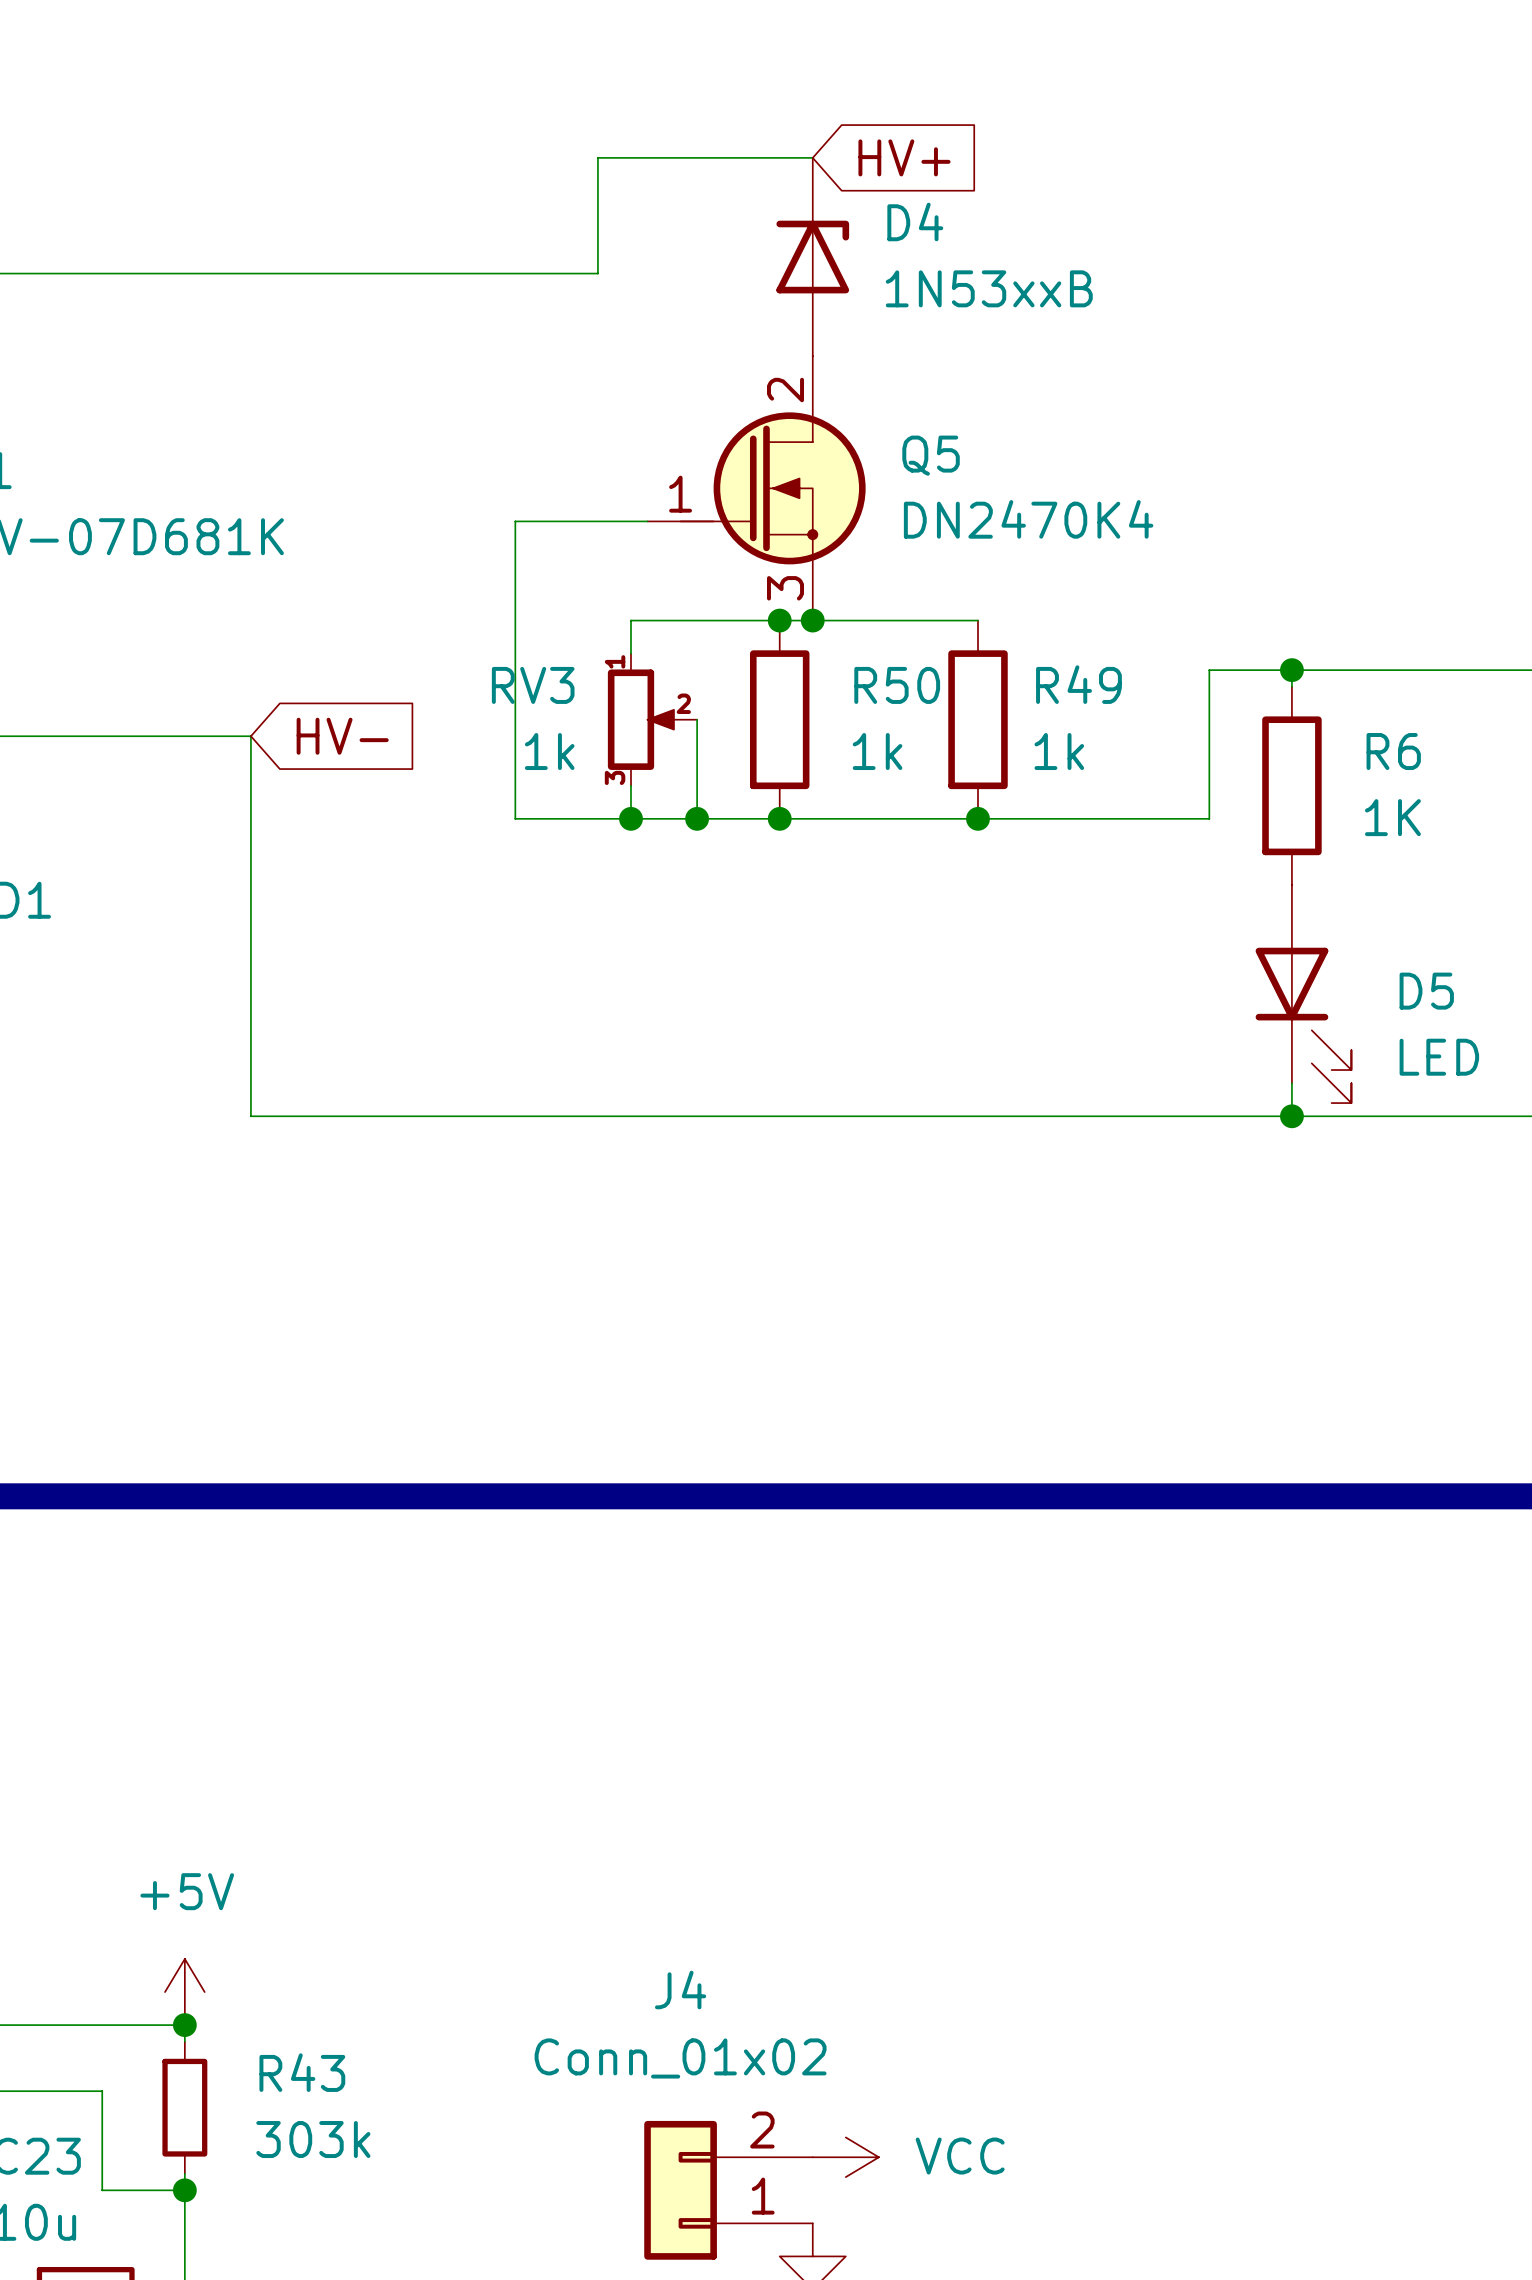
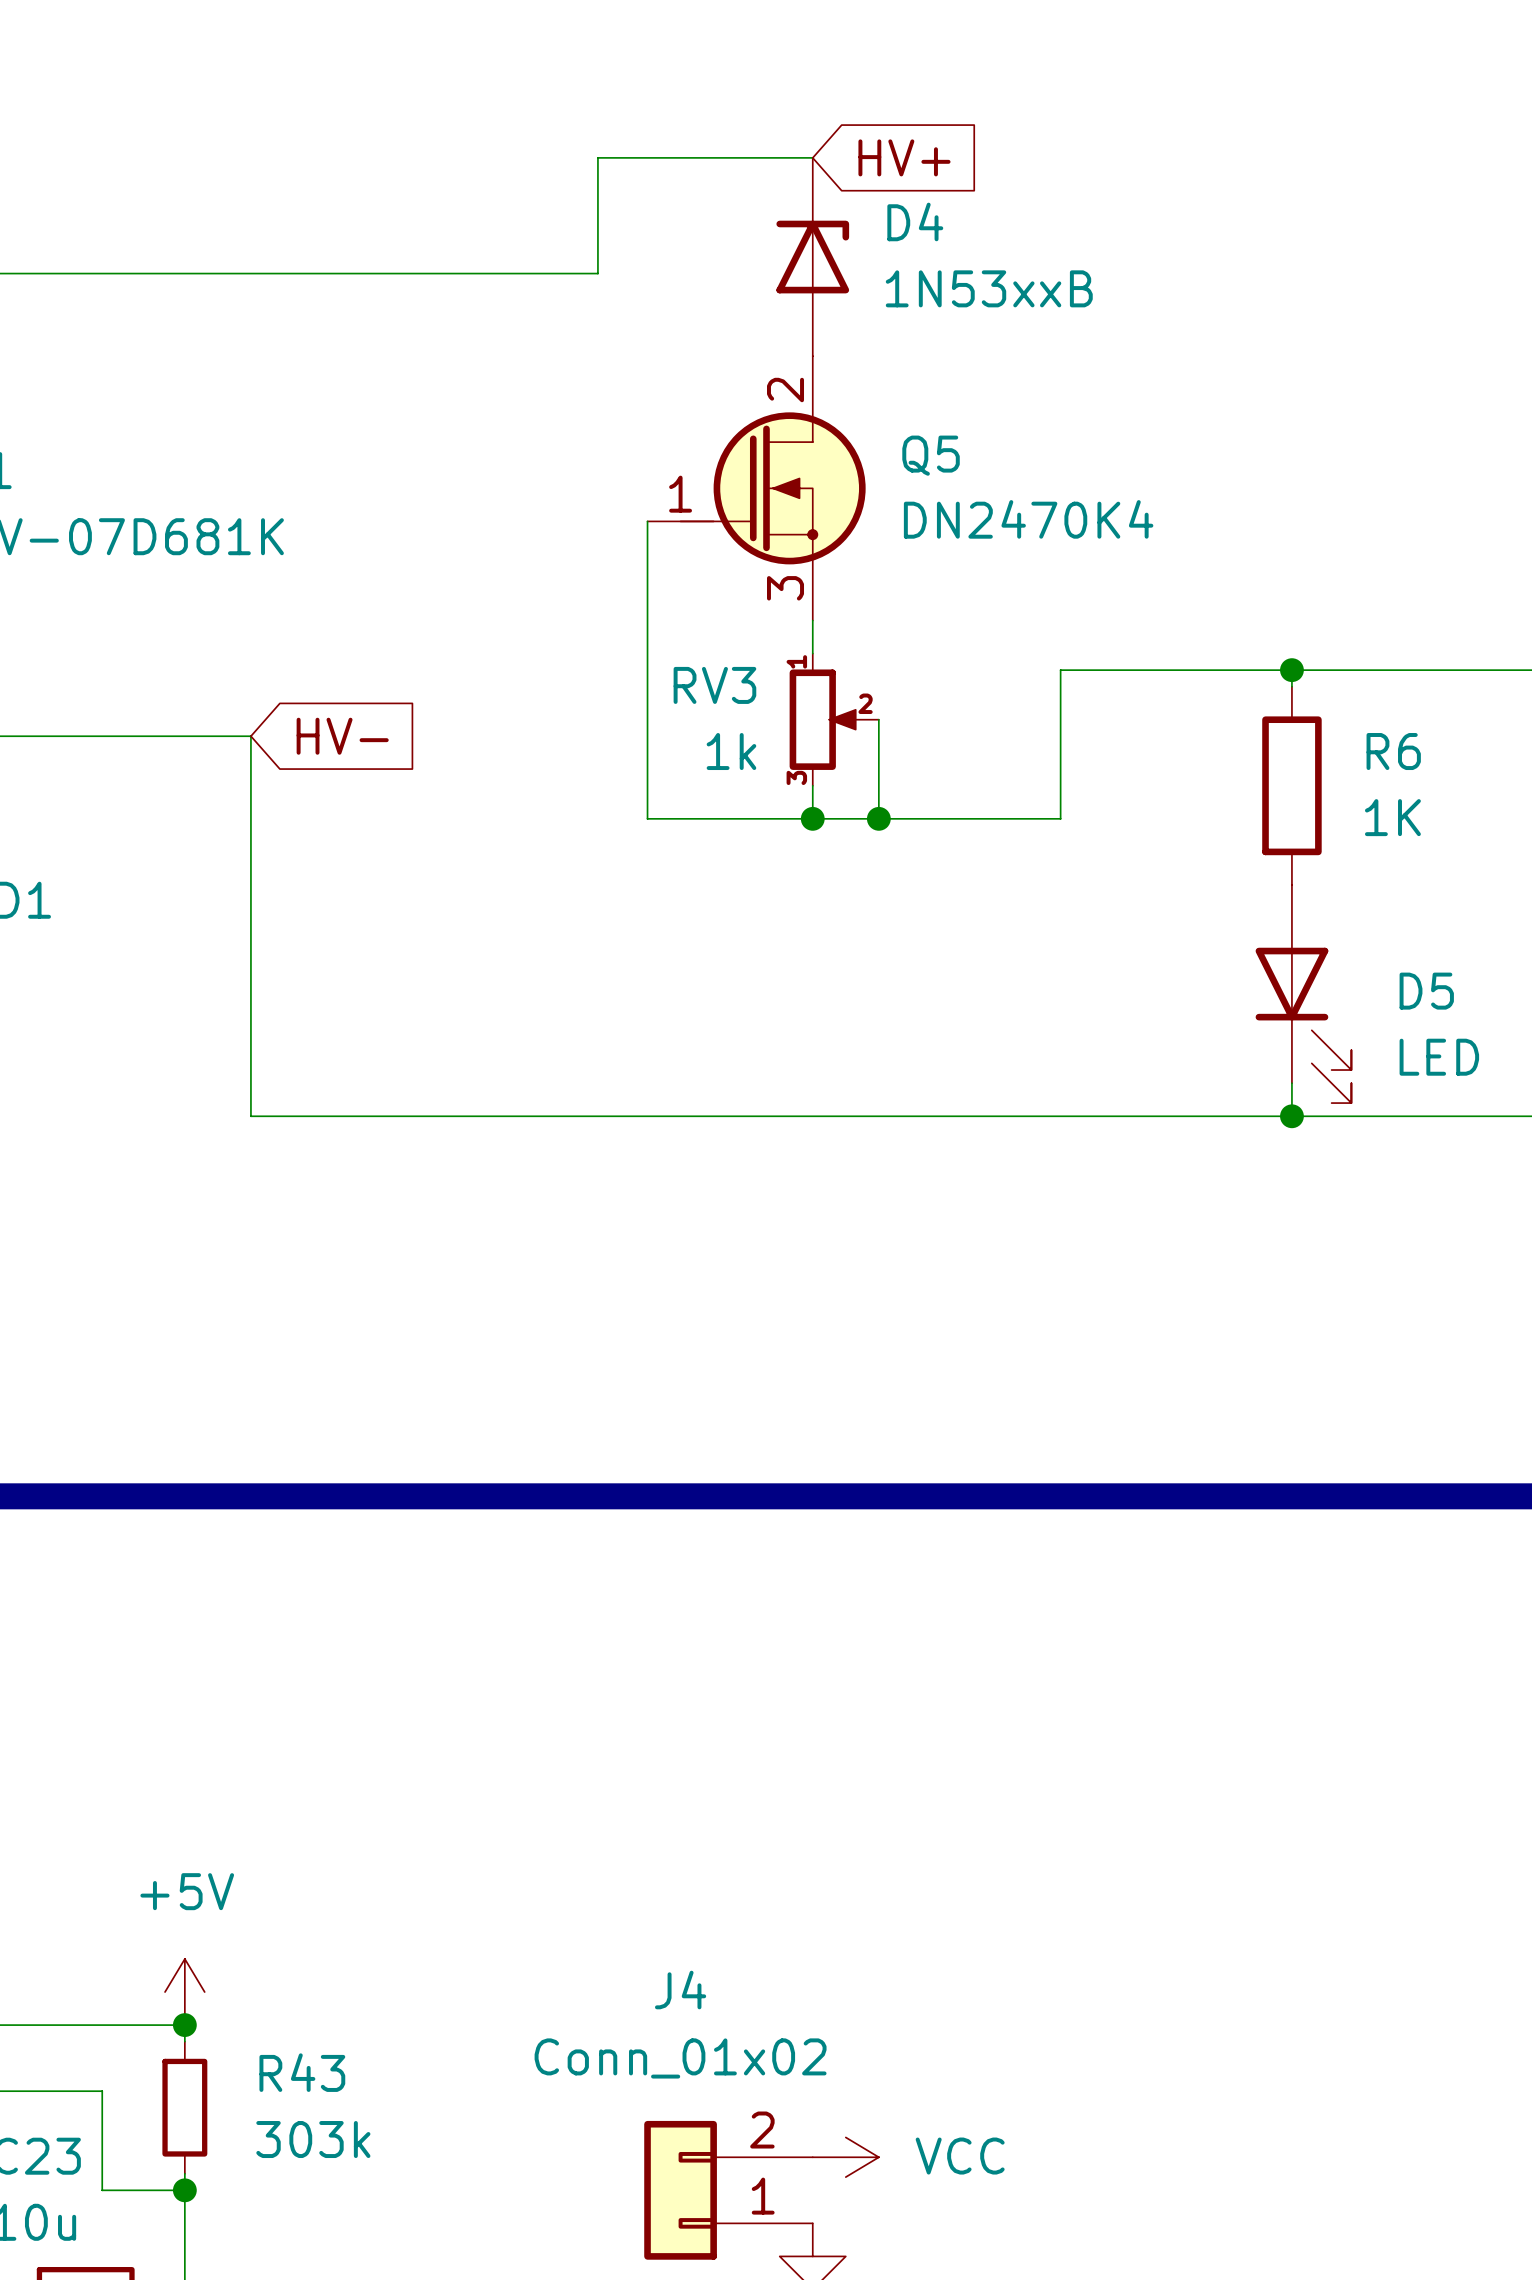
wire: (647, 521) (515, 521) (515, 818) (647, 818) -> (647, 521) (647, 818)
junction: (779, 620) -> none
wire: none -> (812, 620) (812, 653)
junction: (812, 620) -> none
wire: (978, 620) (631, 620) (631, 653) -> none
wire: (1209, 670) (1209, 818) (1060, 818) -> (1209, 670) (1060, 670) (1060, 818)
RV3 position: (652, 719) -> (834, 719)
wire: (697, 719) (697, 818) -> (878, 719) (878, 818)
R50: 1k (779, 719) -> none
R49: 1k (978, 719) -> none
wire: (631, 785) (631, 818) -> (812, 785) (812, 818)
junction: (631, 818) -> none
junction: (697, 818) -> none
junction position: (779, 818) -> (812, 818)
junction: none -> (878, 818)
junction: (978, 818) -> none

